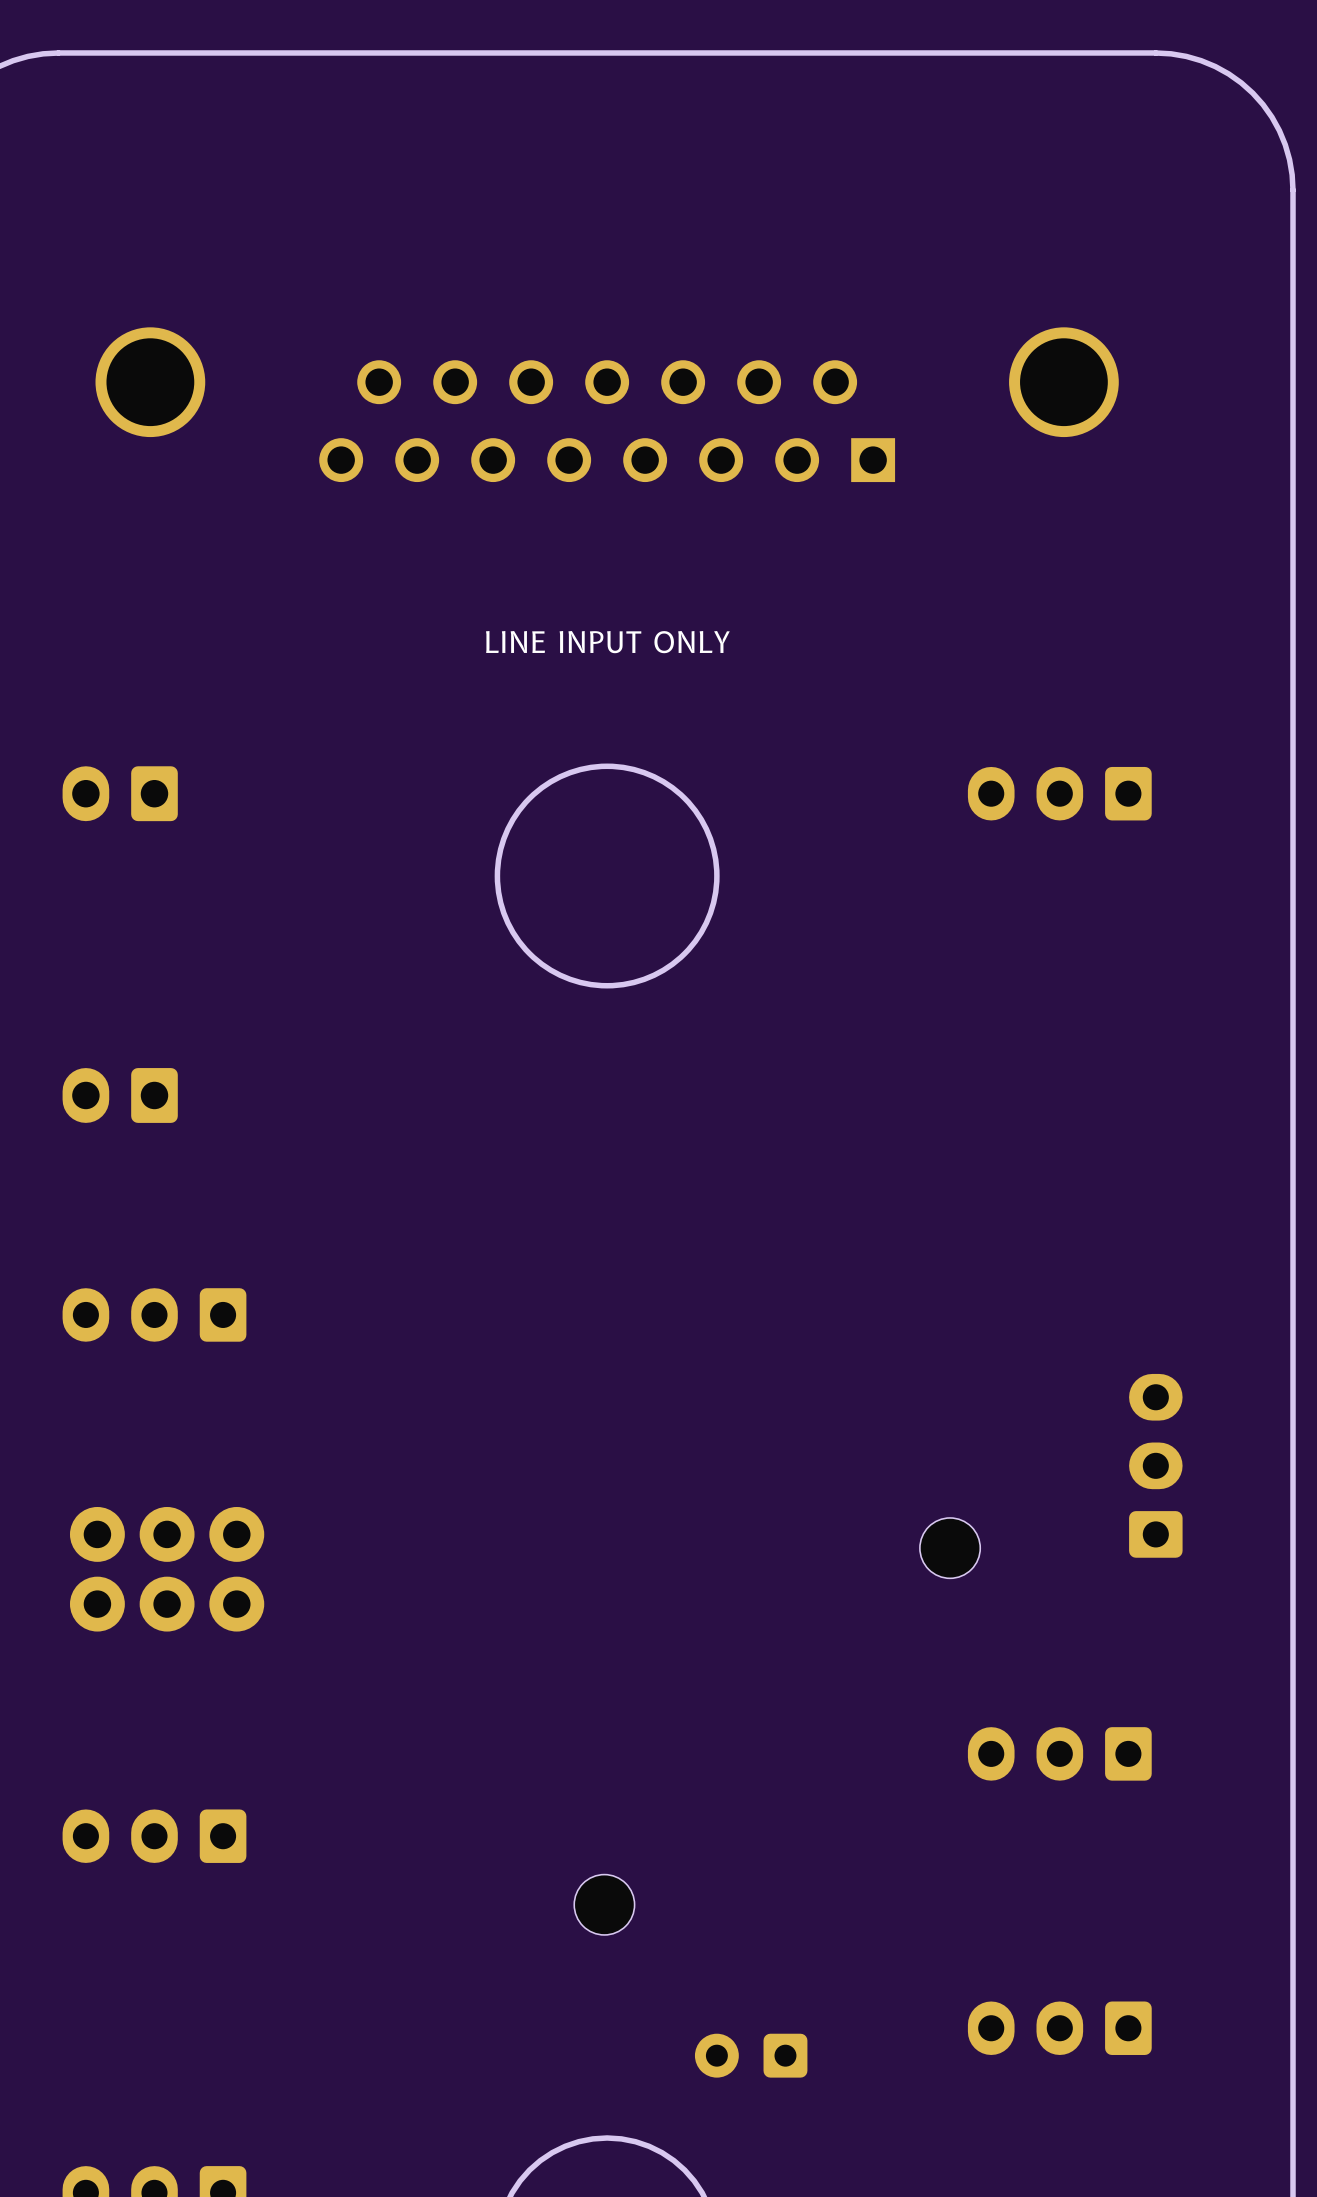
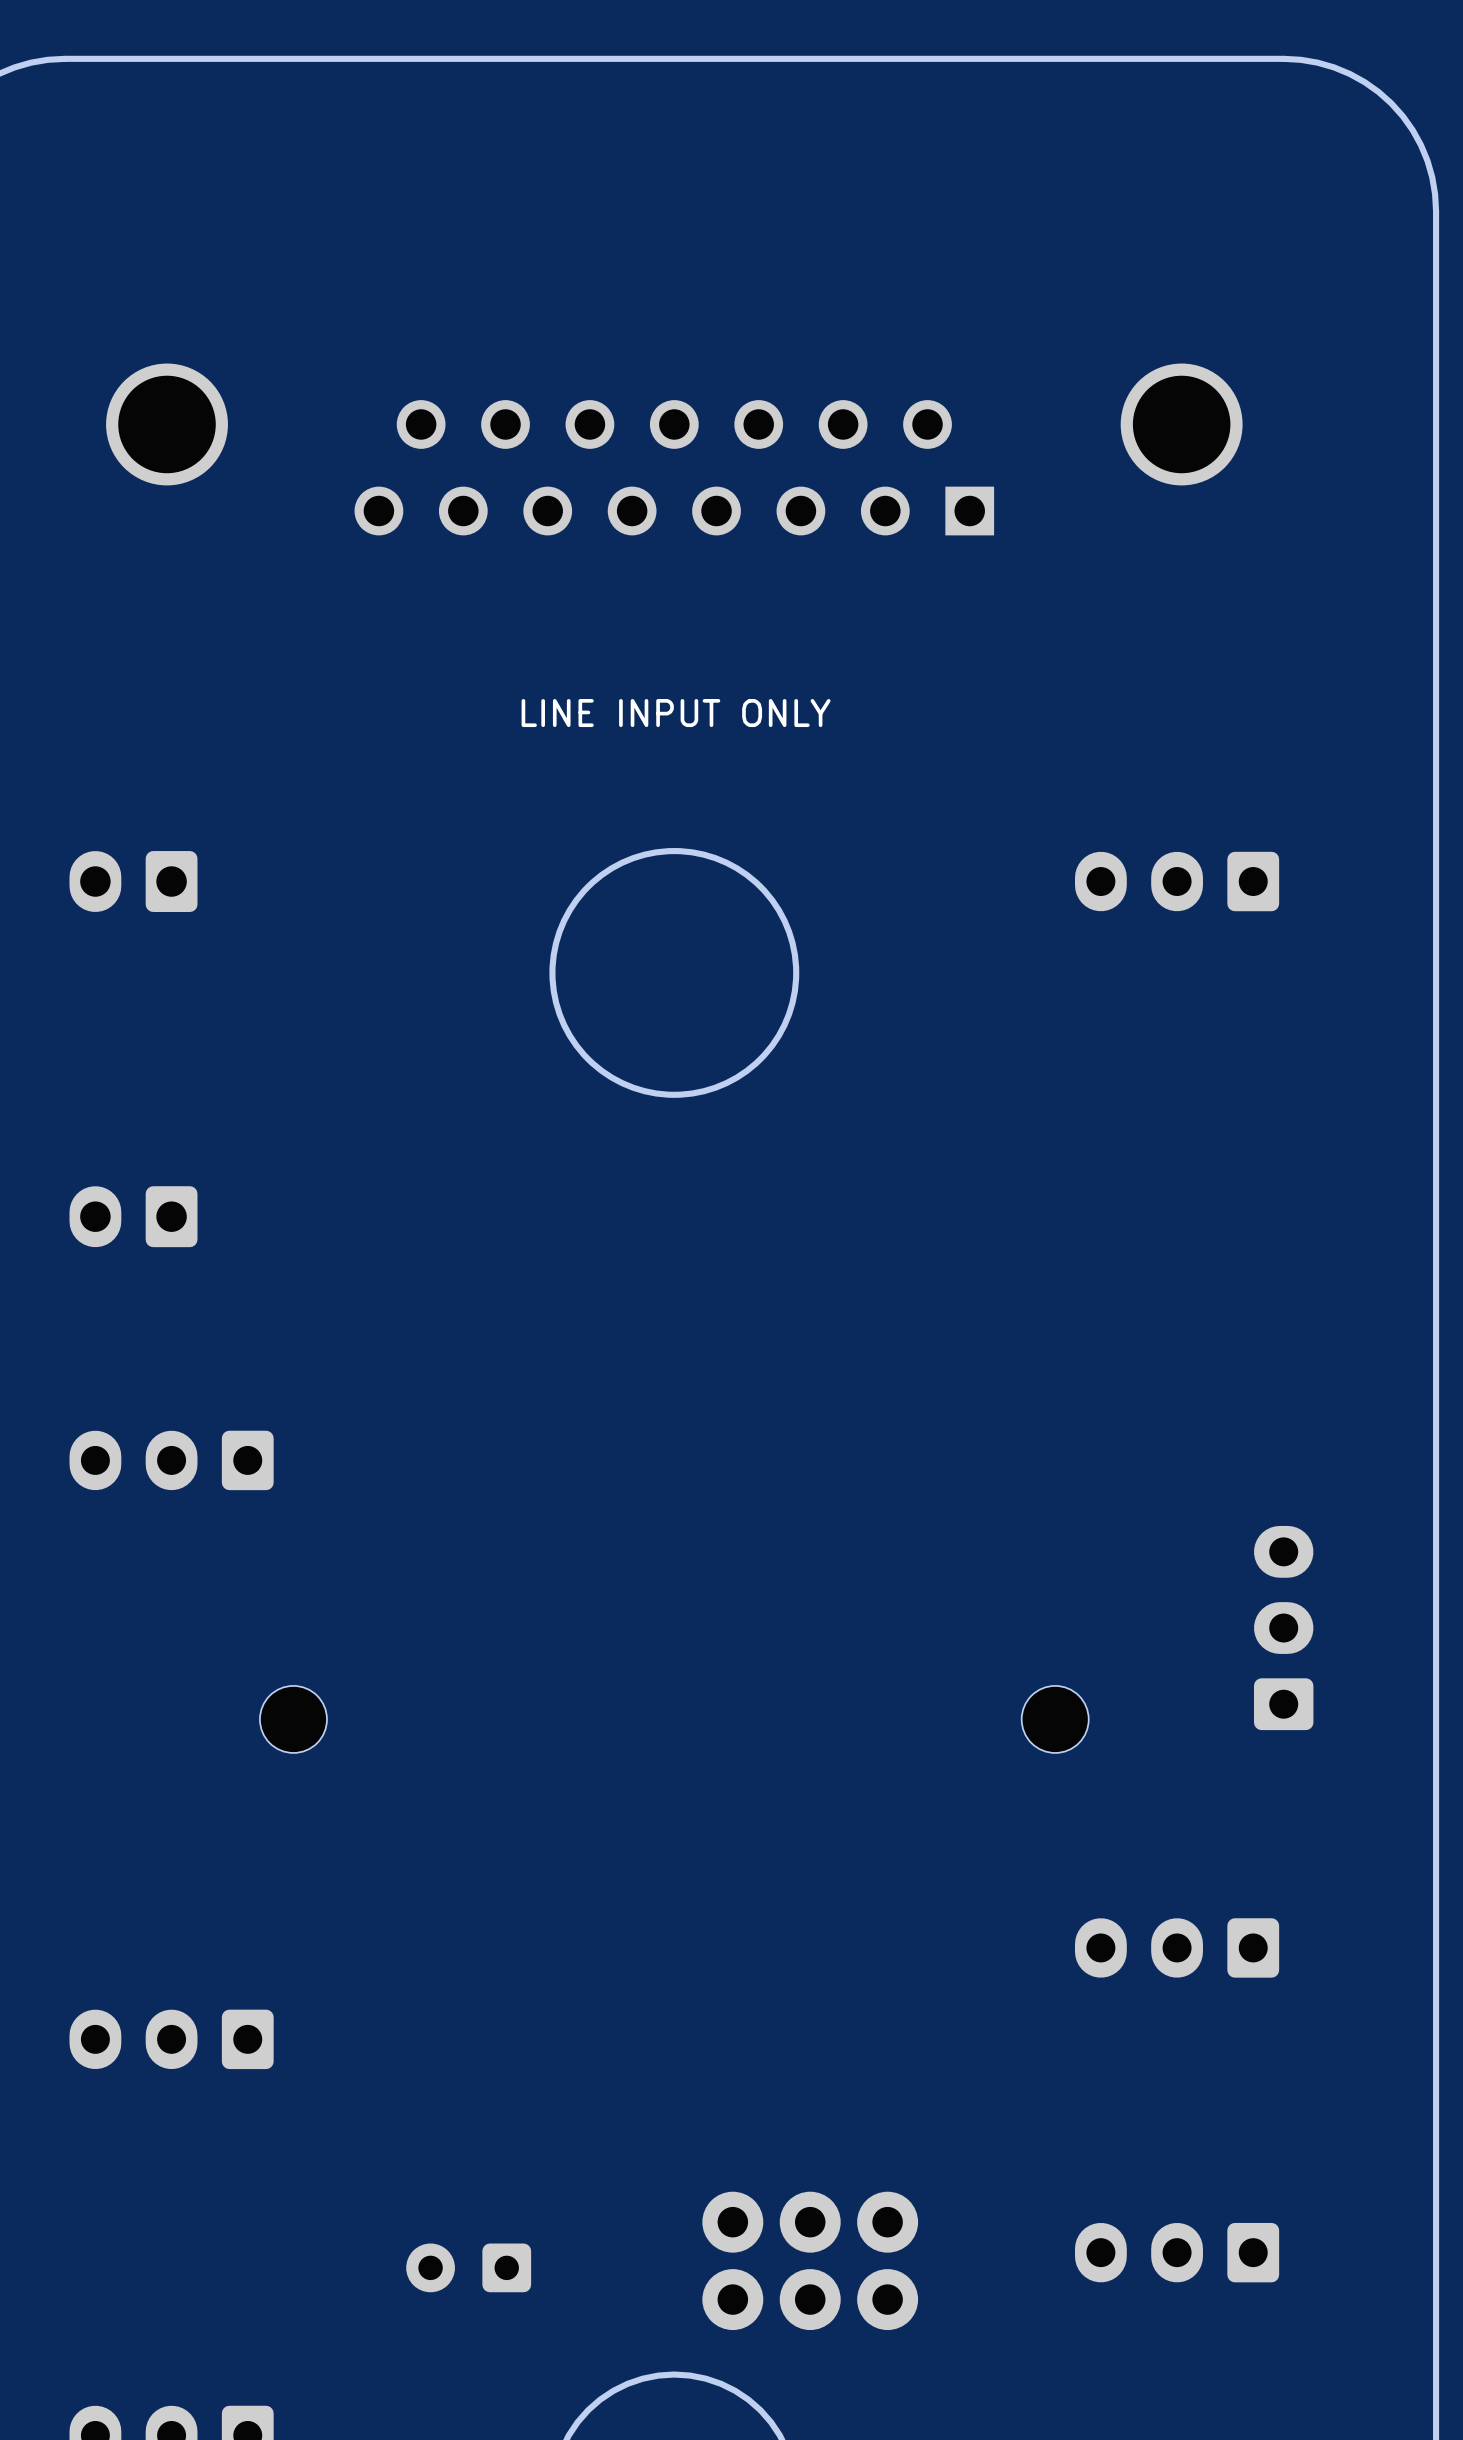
part: (167, 1569) -> none
part position: (604, 1904) -> (293, 1719)
part: none -> (810, 2260)
part position: (751, 2055) -> (468, 2267)

